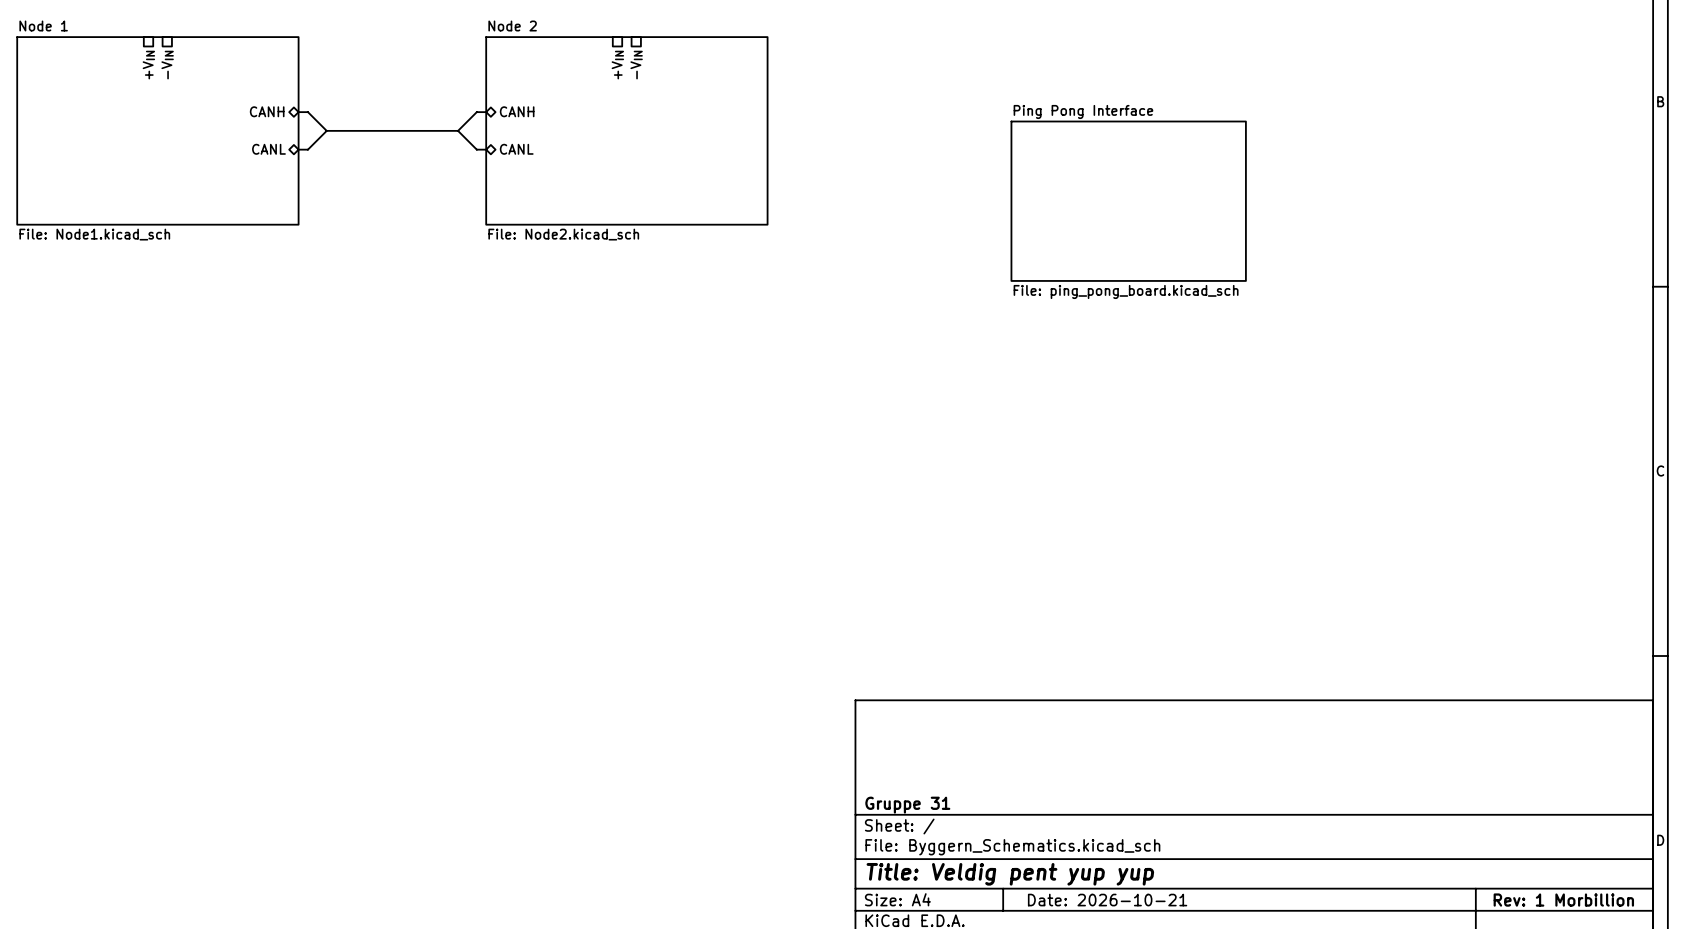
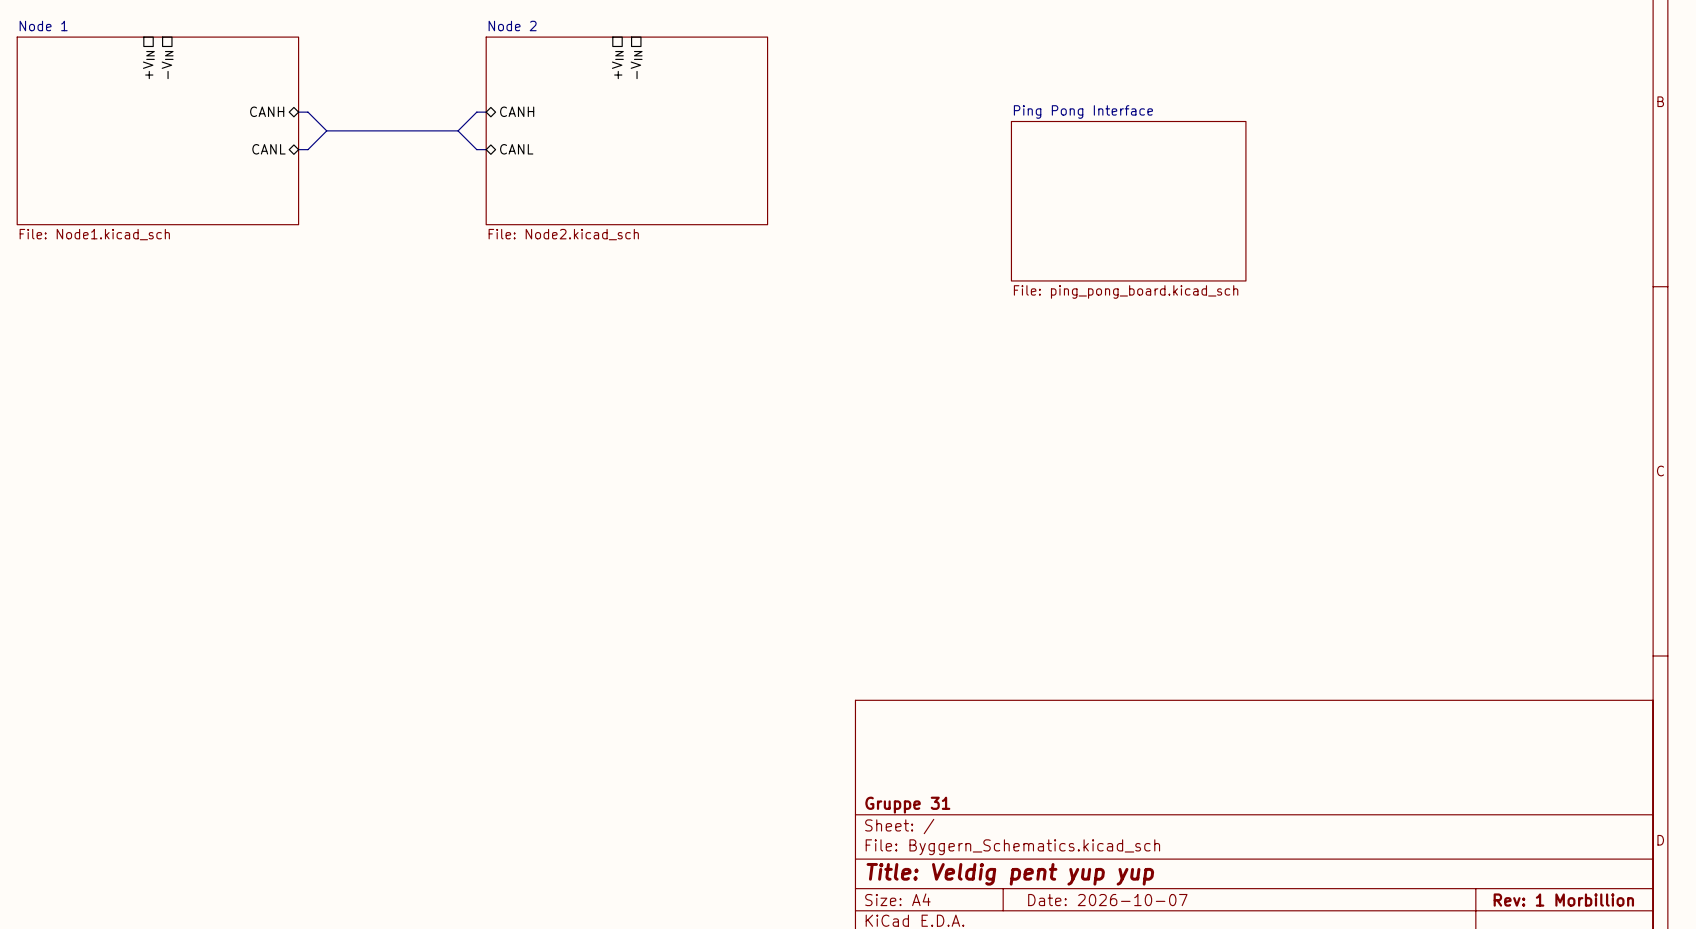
title block: Date: 2026-10-21 (1107, 900) -> Date: 2026-10-07 (1107, 900)

